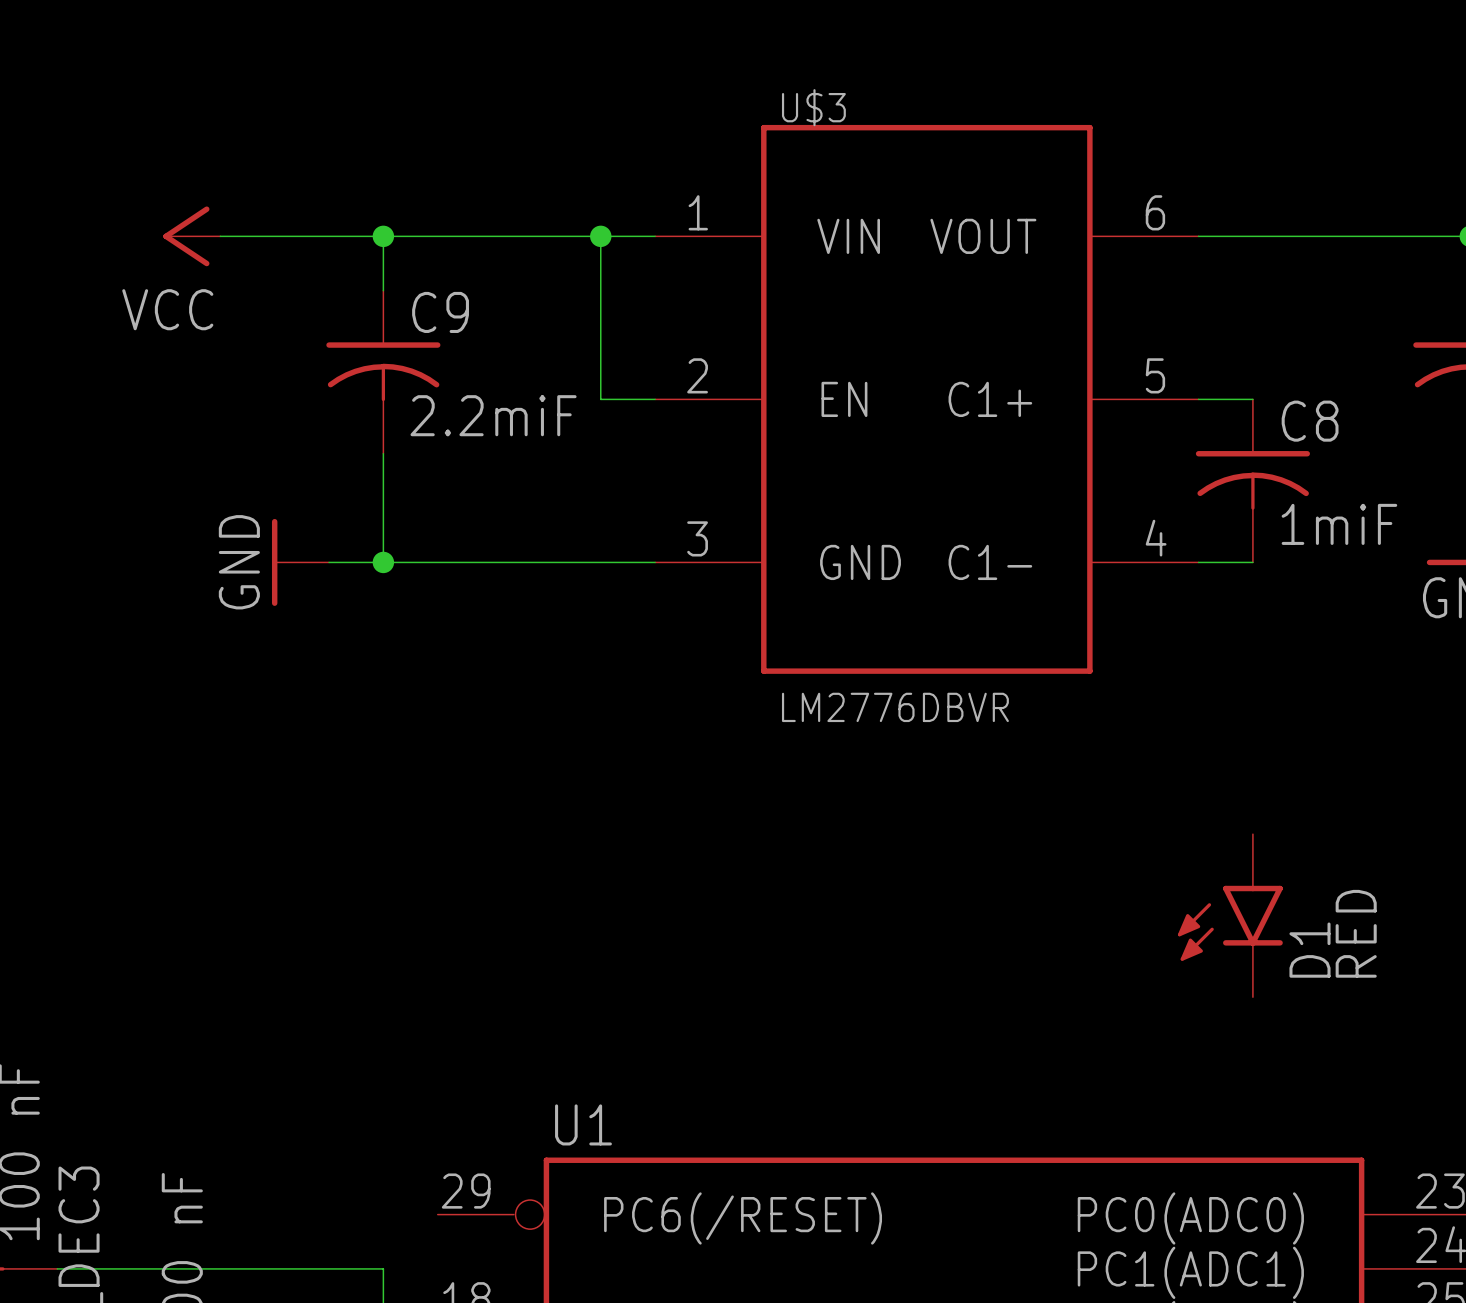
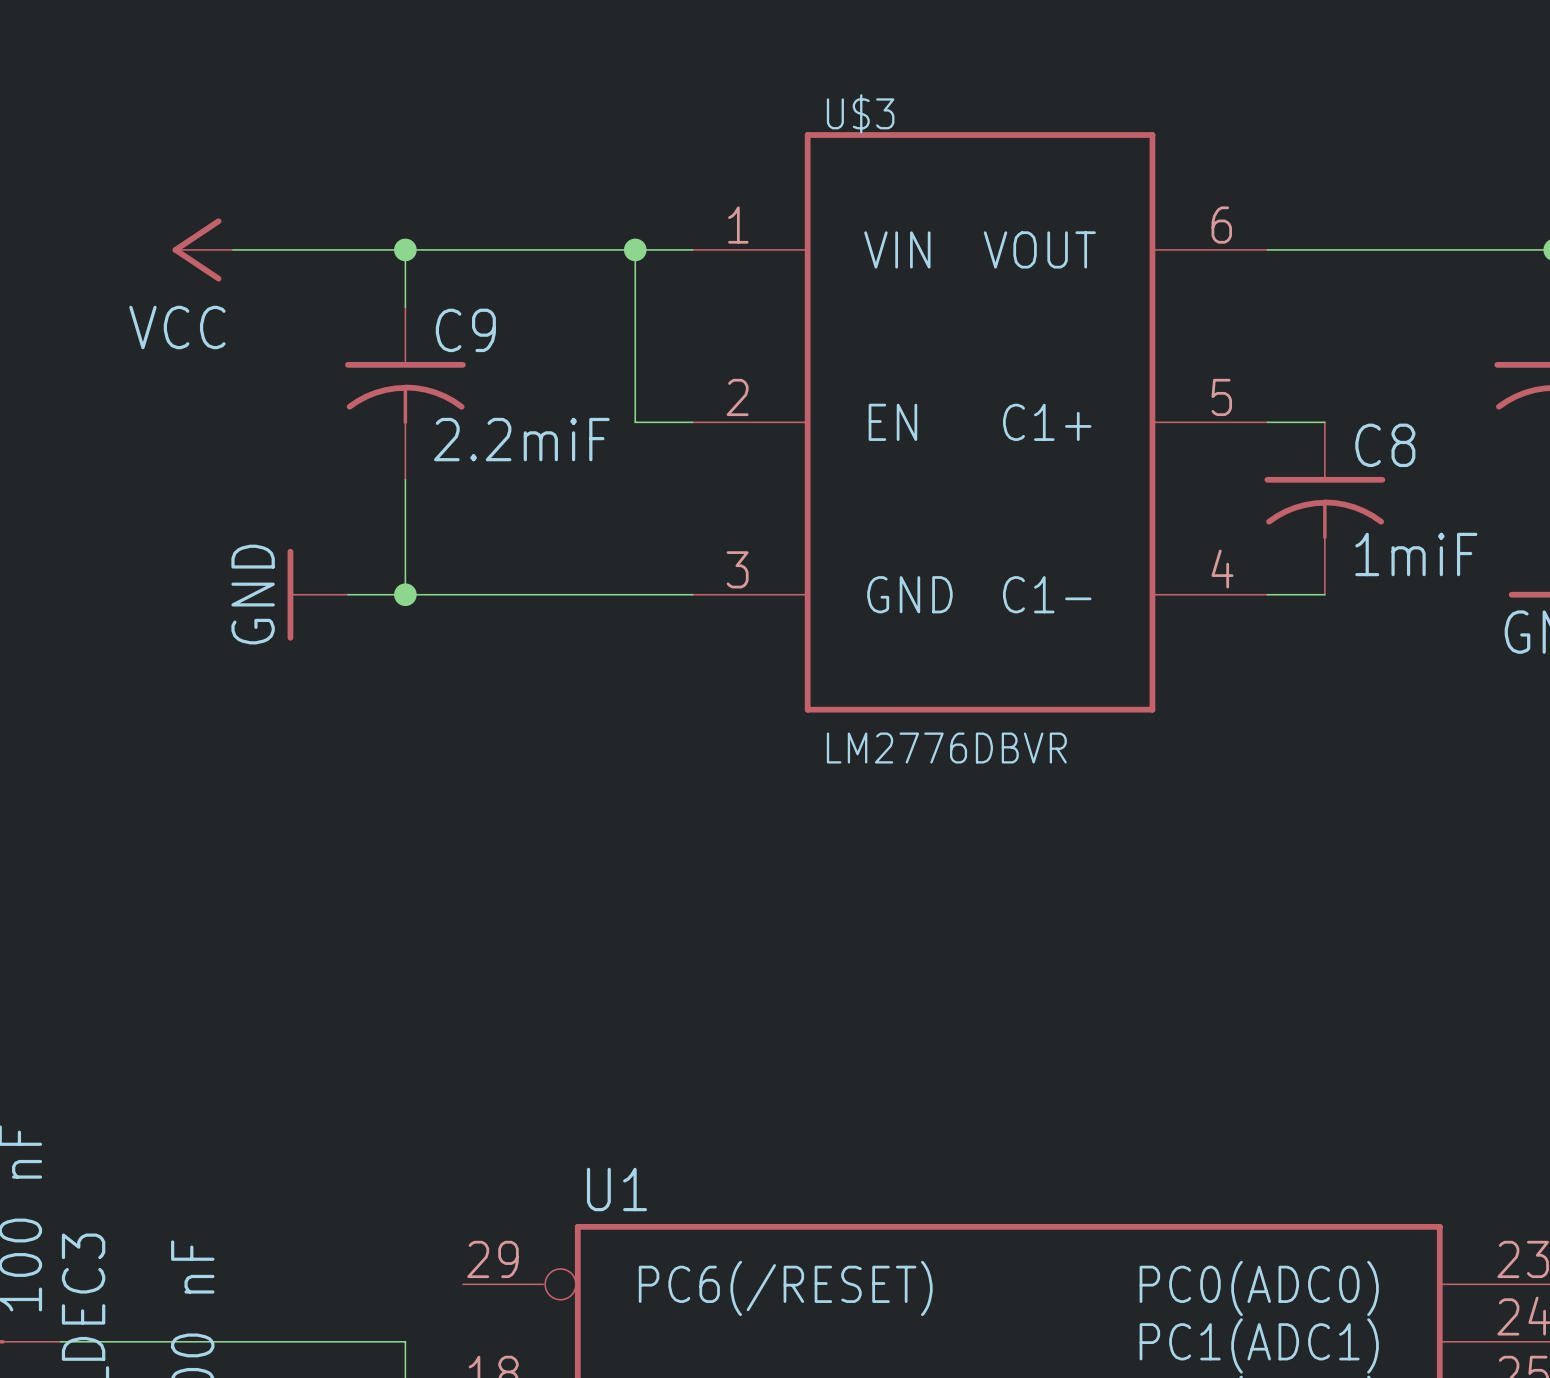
D1: RED (1230, 915) -> none

